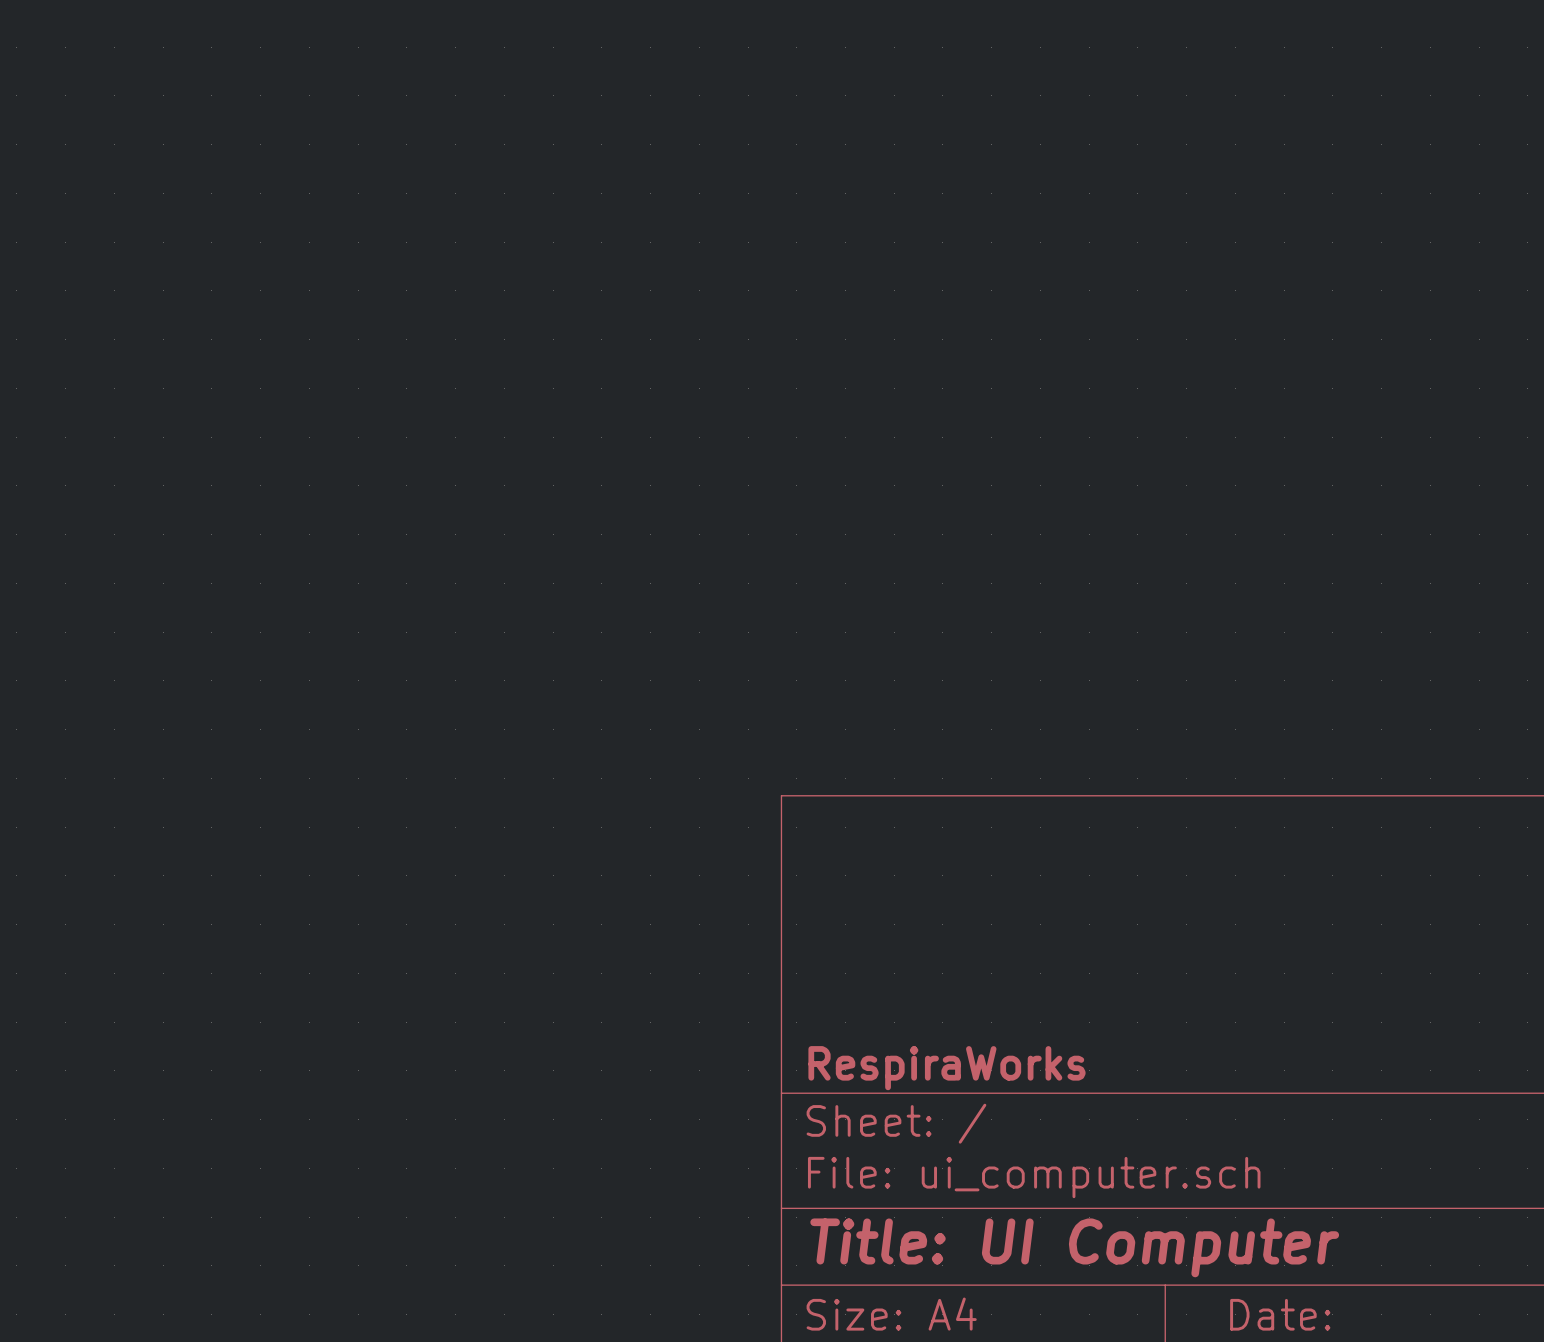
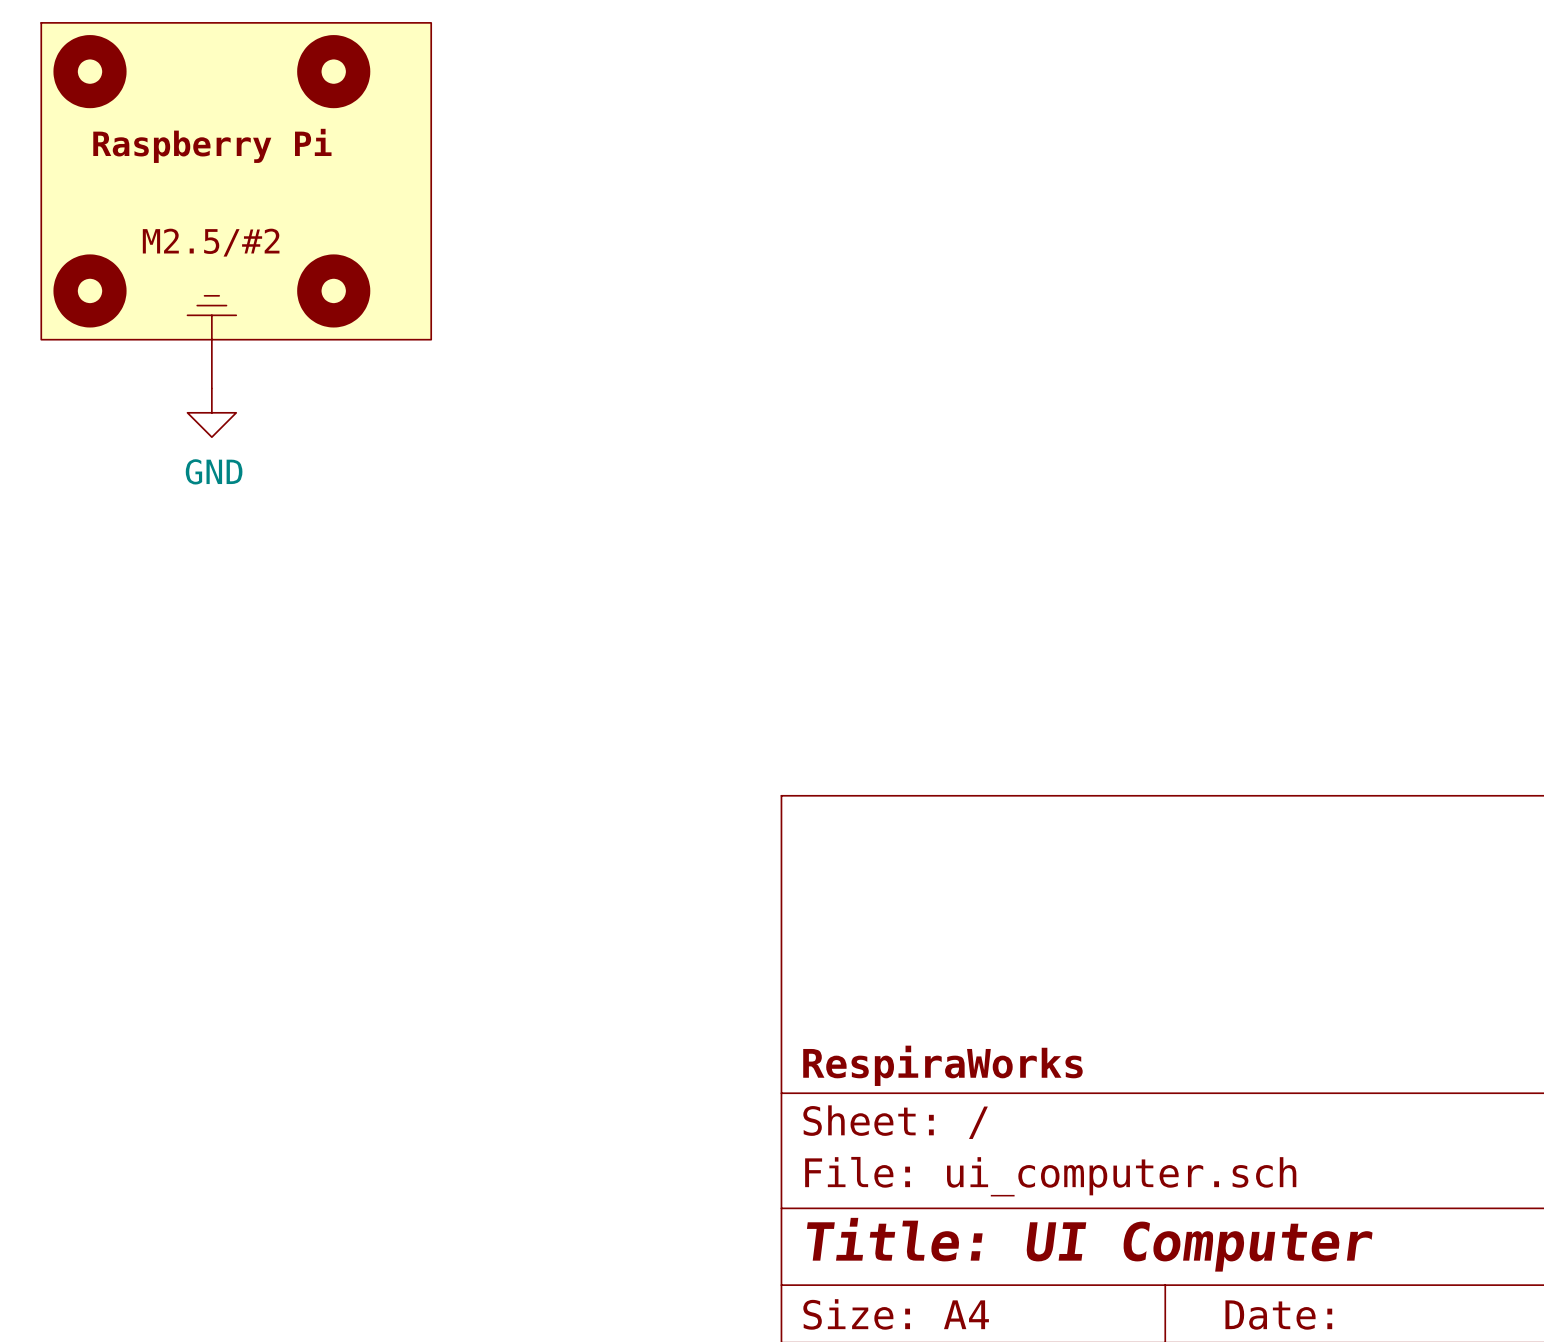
part: none -> (236, 205)
power symbol: none -> GND (211, 412)

